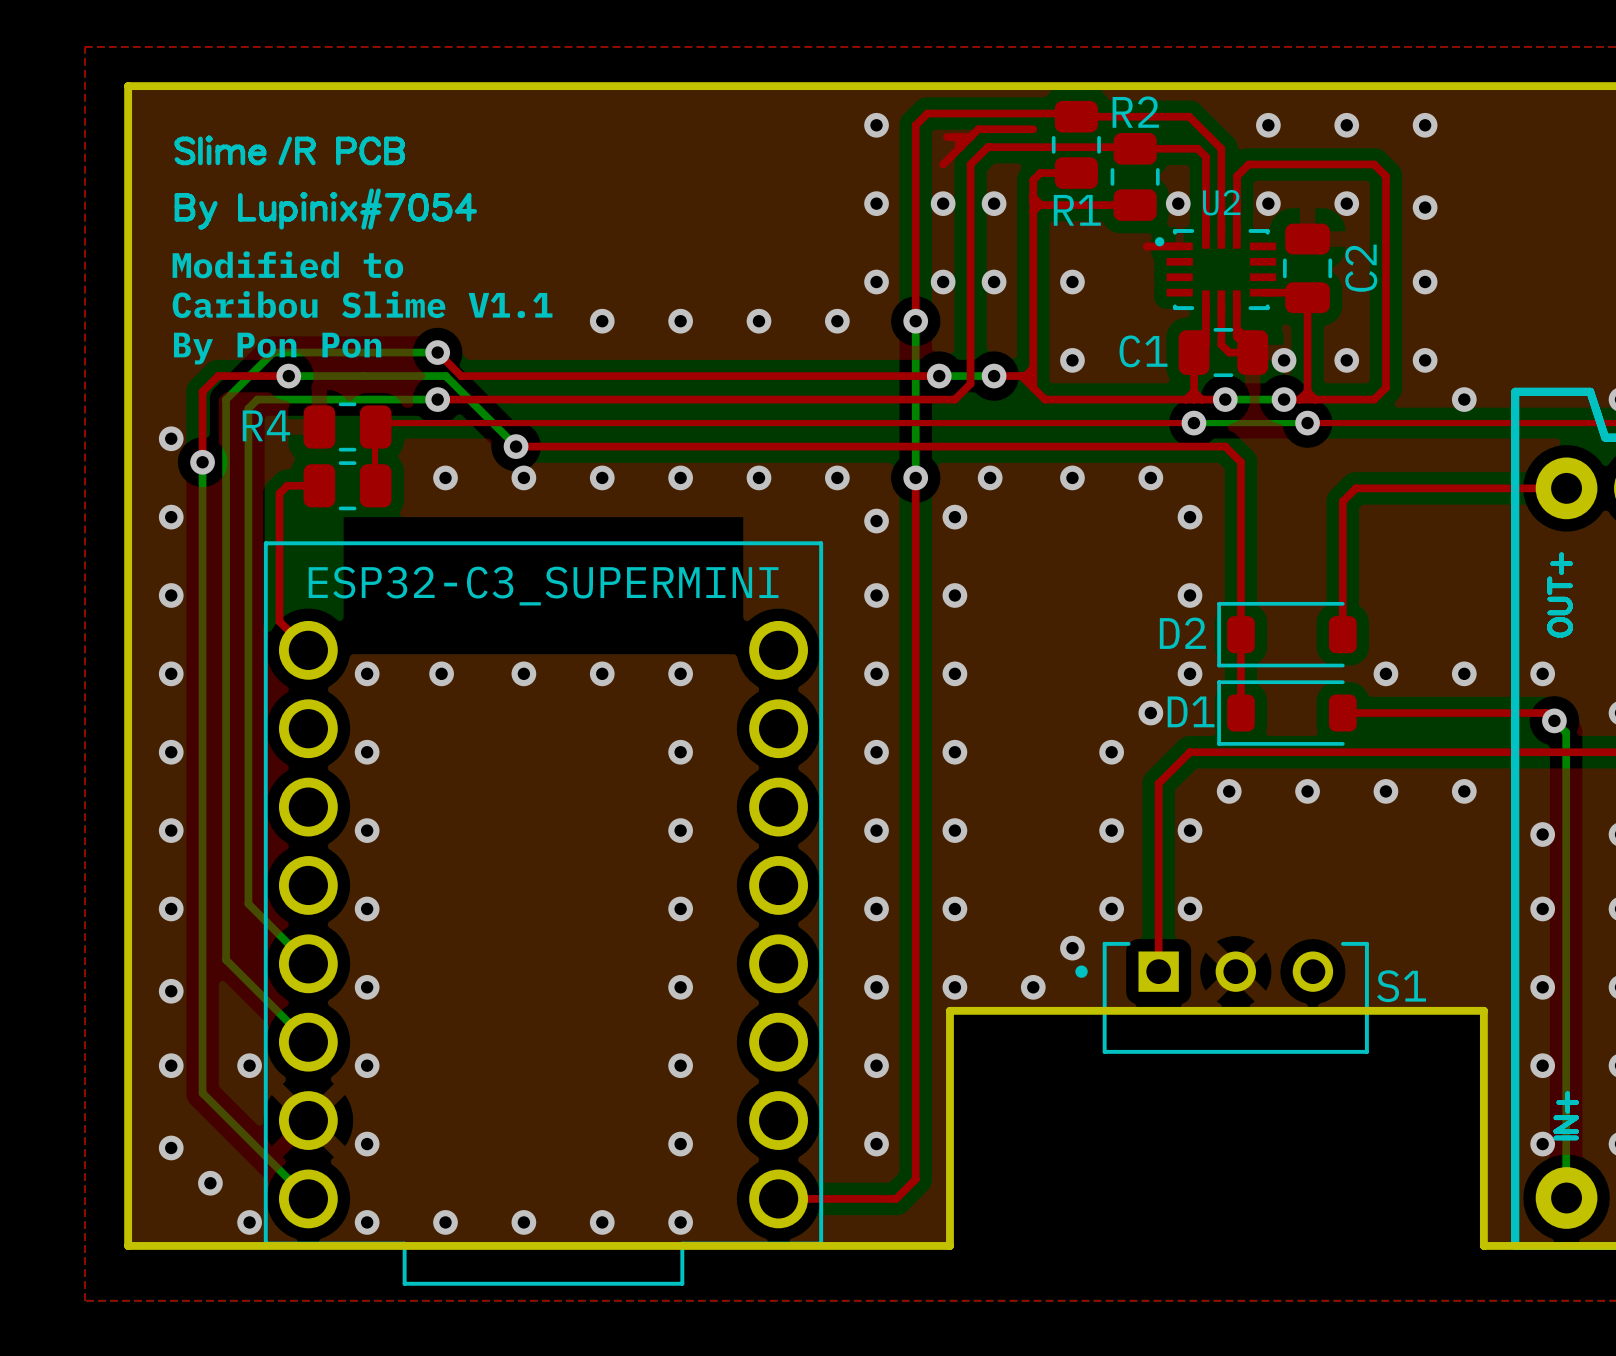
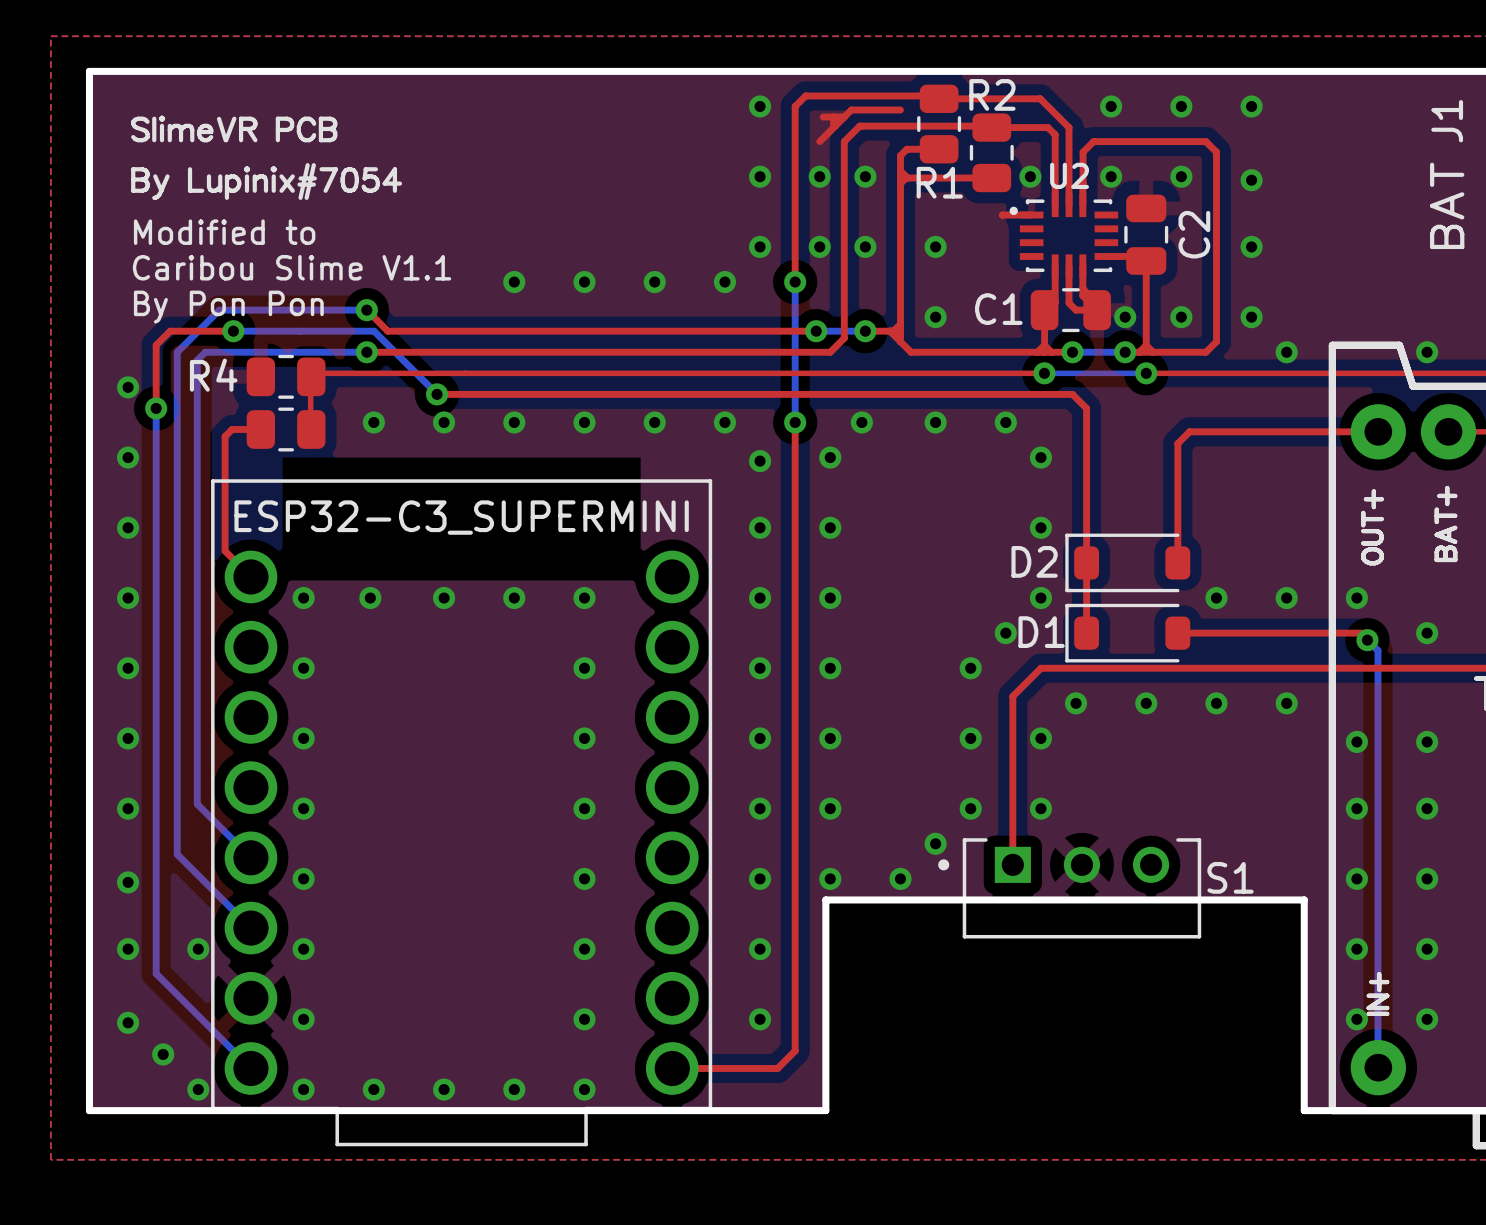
line: none -> (219, 118) (225, 140)

